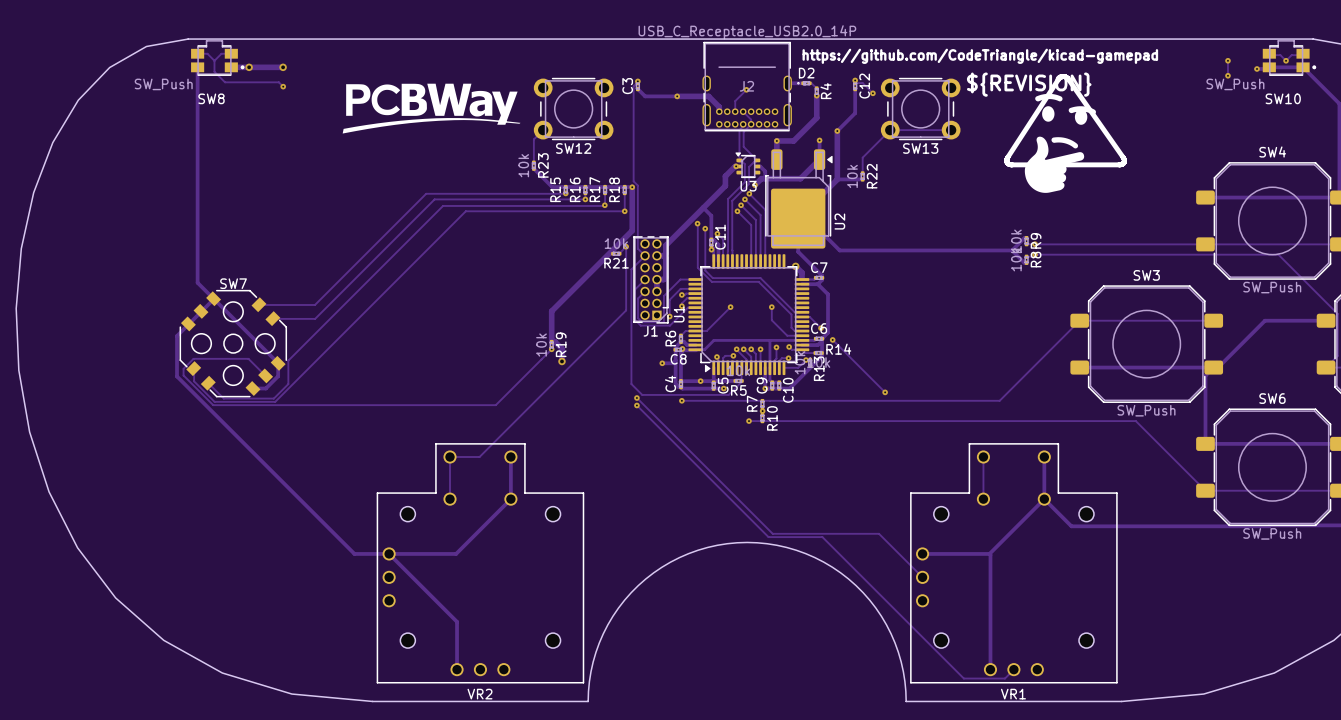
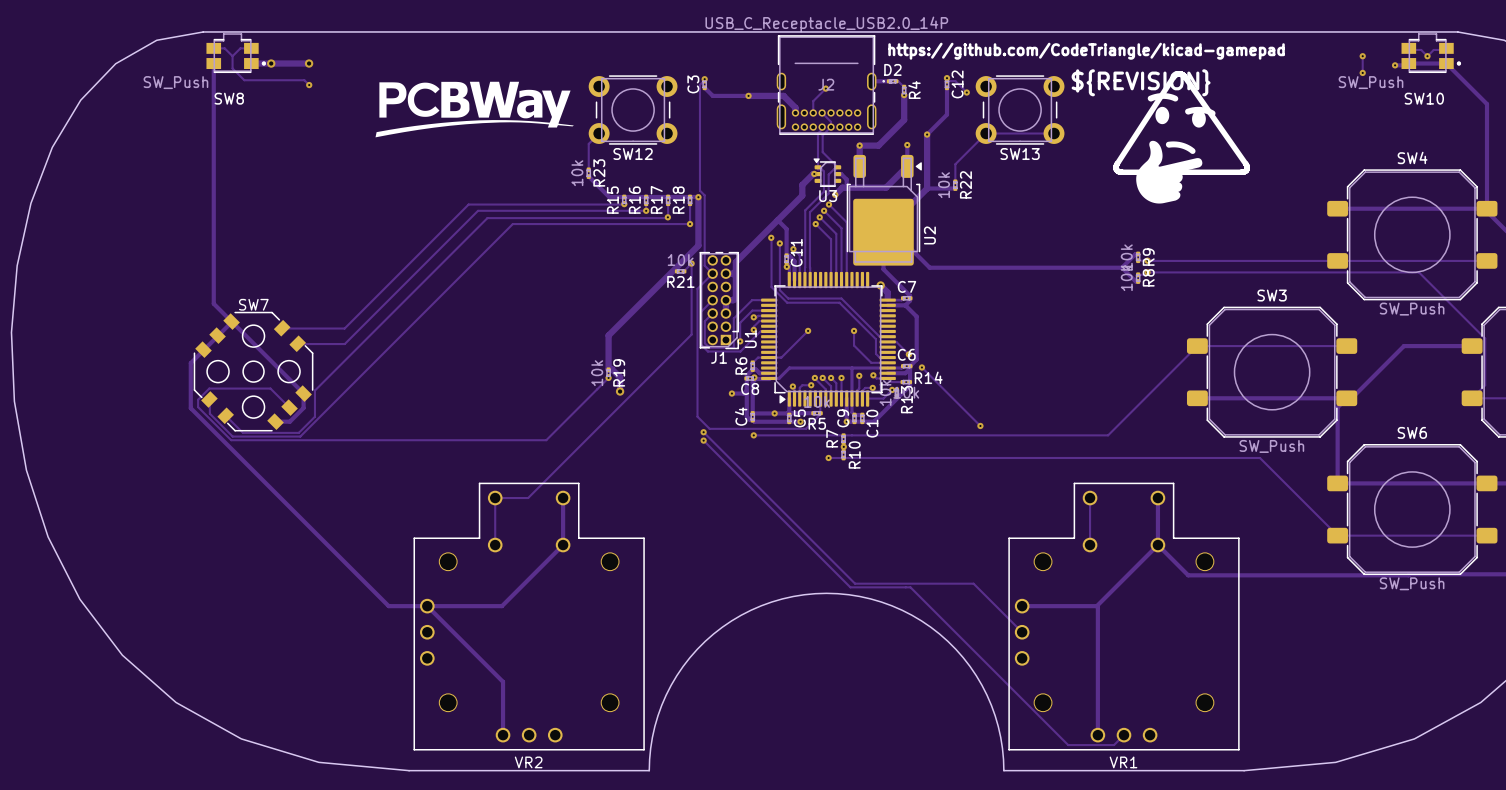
VR2 footprint: [376, 443, 584, 684] -> [413, 482, 645, 751]
VR1 footprint: [910, 443, 1118, 684] -> [1008, 482, 1240, 751]

